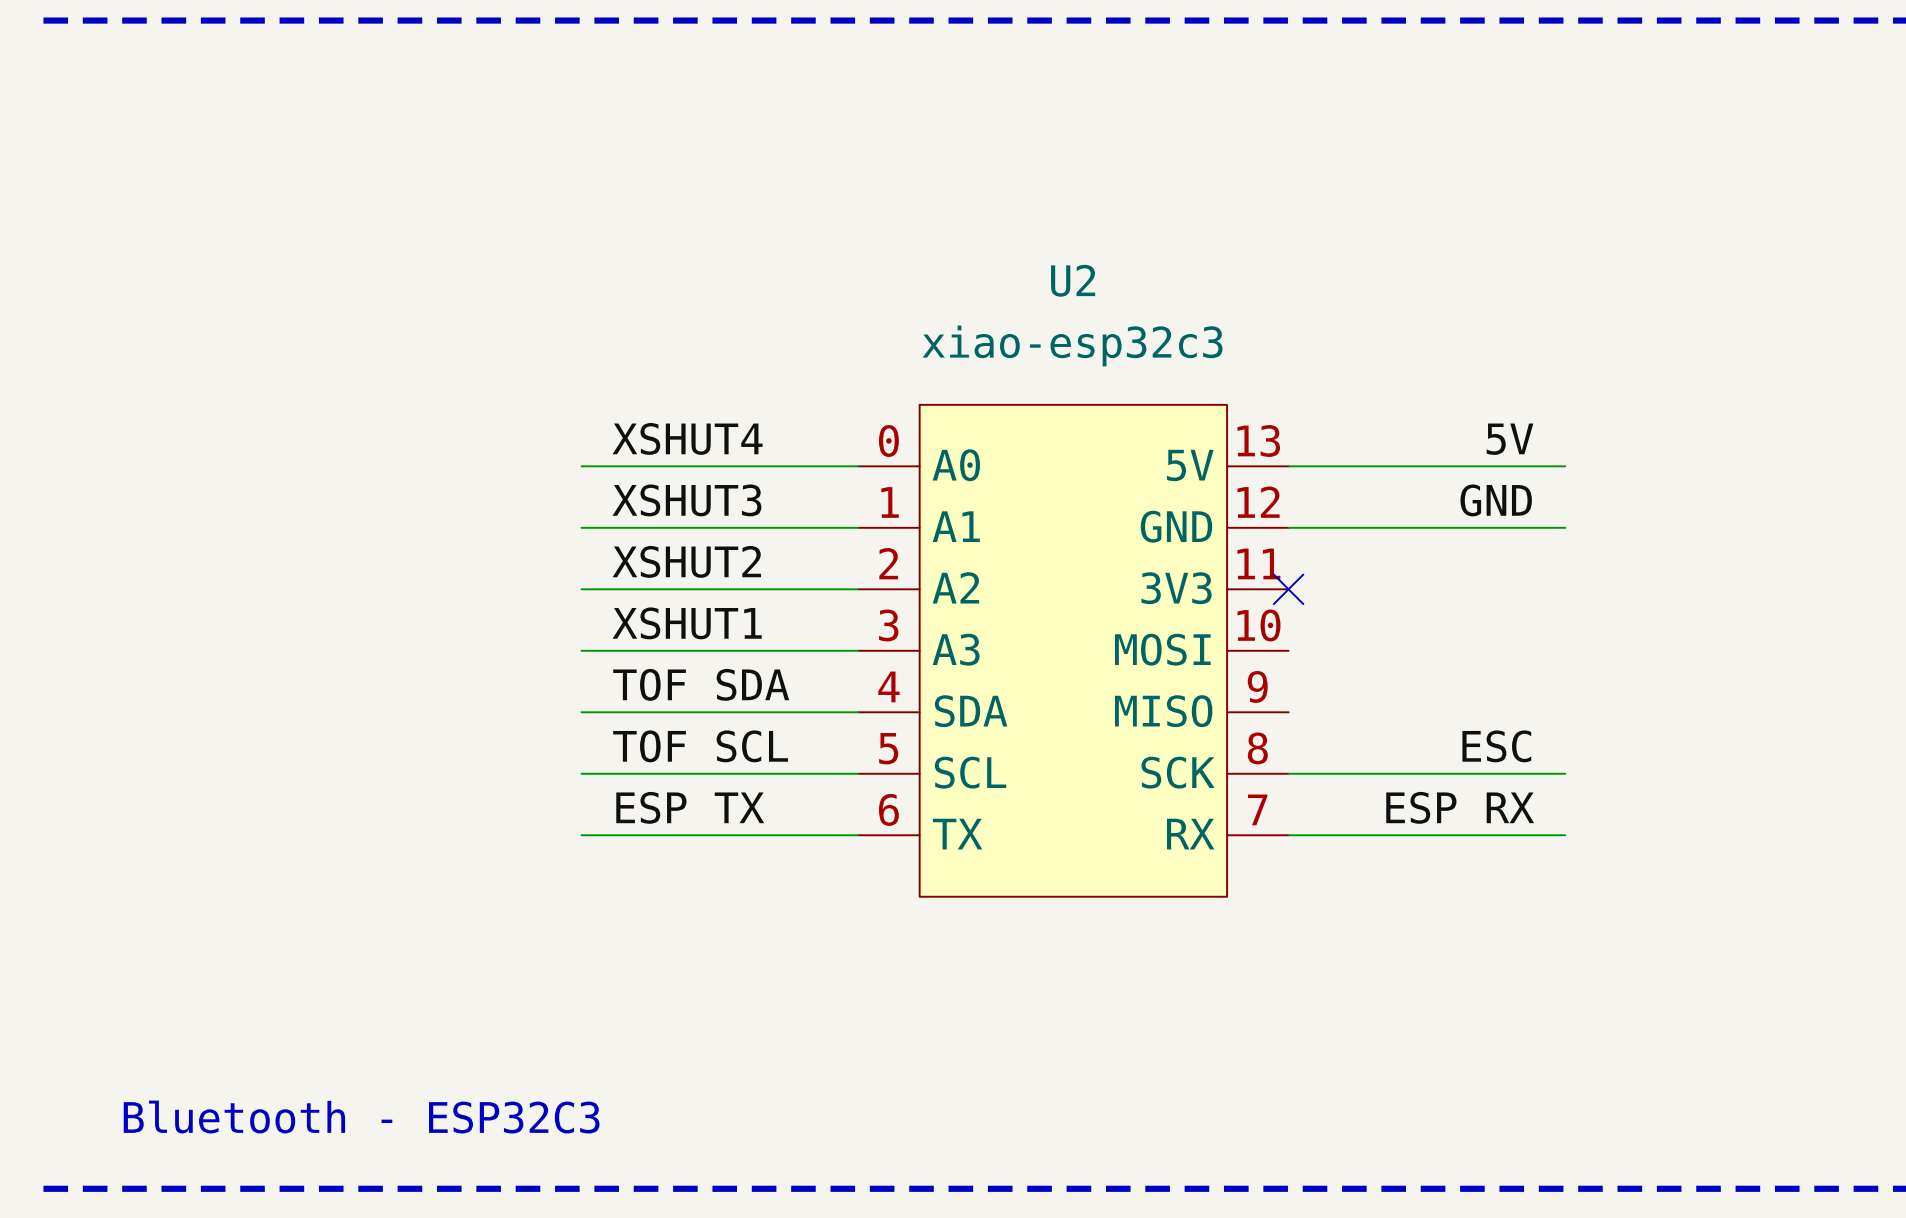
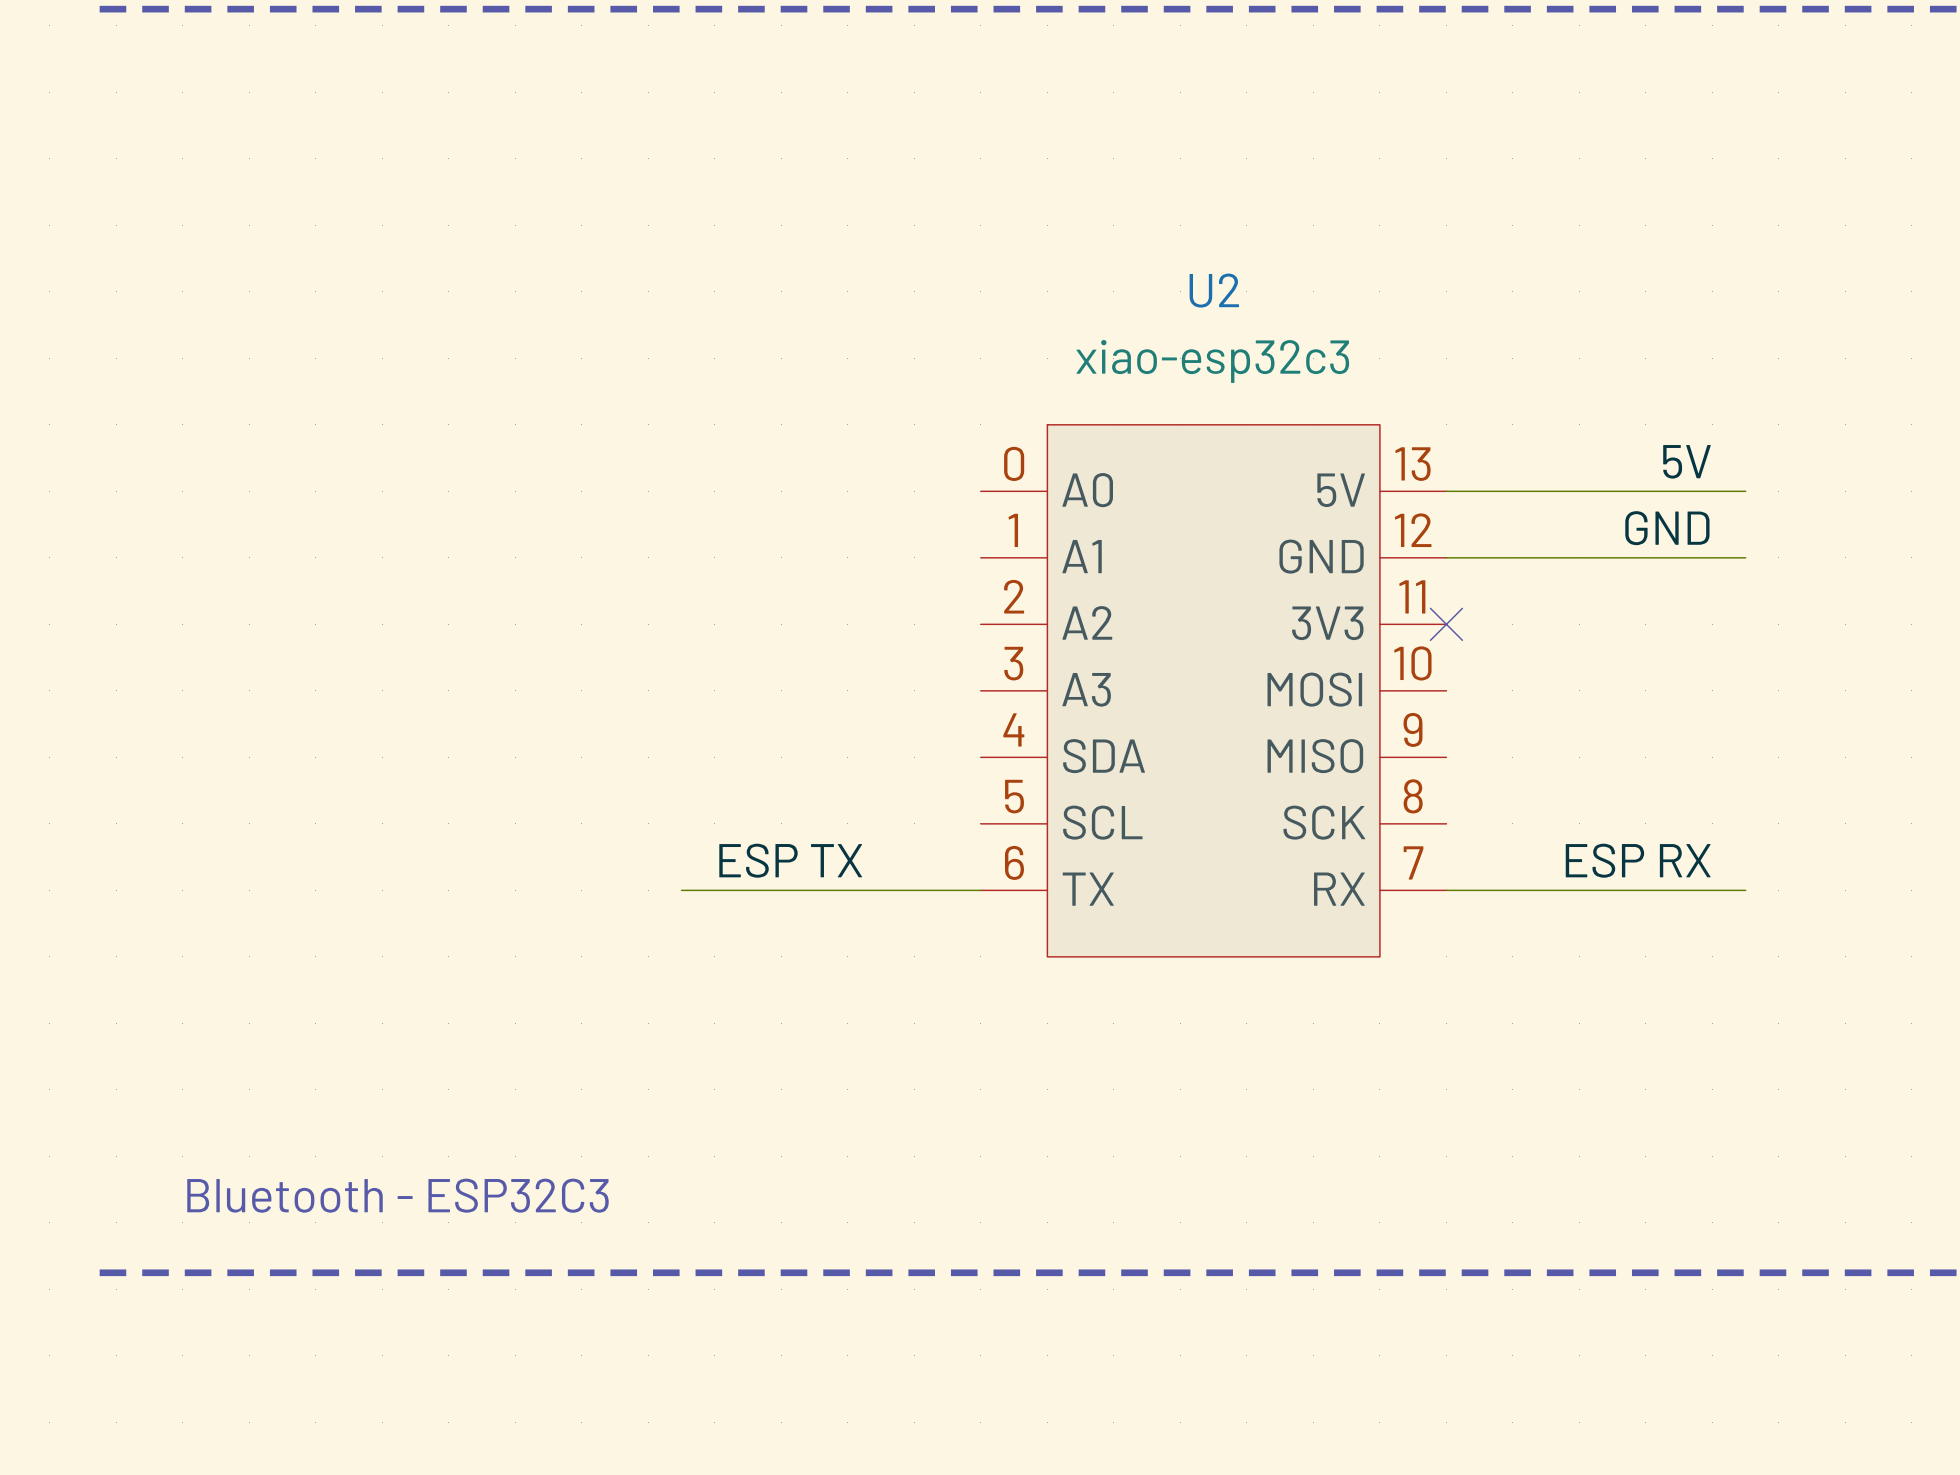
label: XSHUT4 (687, 438) -> none
wire: (581, 466) (858, 466) -> none
label: XSHUT3 (686, 500) -> none
wire: (581, 527) (858, 527) -> none
label: XSHUT2 (686, 561) -> none
wire: (581, 589) (858, 589) -> none
label: XSHUT1 (687, 623) -> none
wire: (581, 650) (858, 650) -> none
label: TOF SDA (701, 684) -> none
wire: (581, 712) (858, 712) -> none
label: TOF SCL (700, 746) -> none
label: ESC (1496, 746) -> none
wire: (581, 773) (858, 773) -> none
wire: (1288, 773) (1565, 773) -> none

